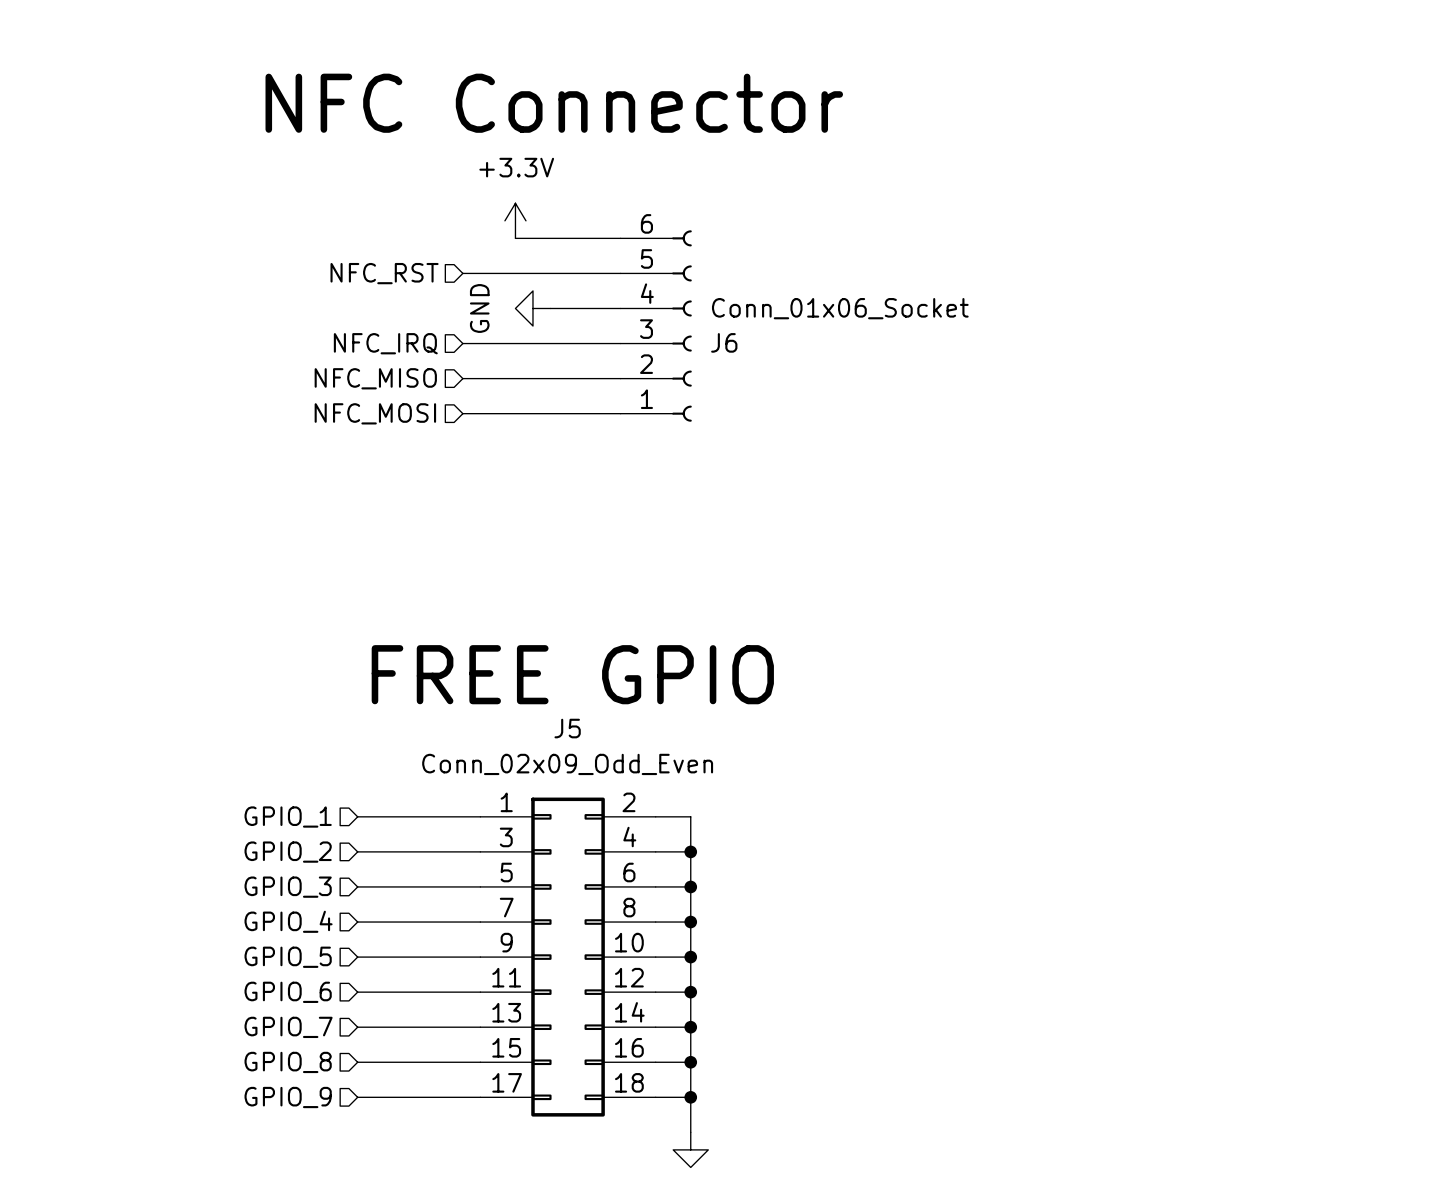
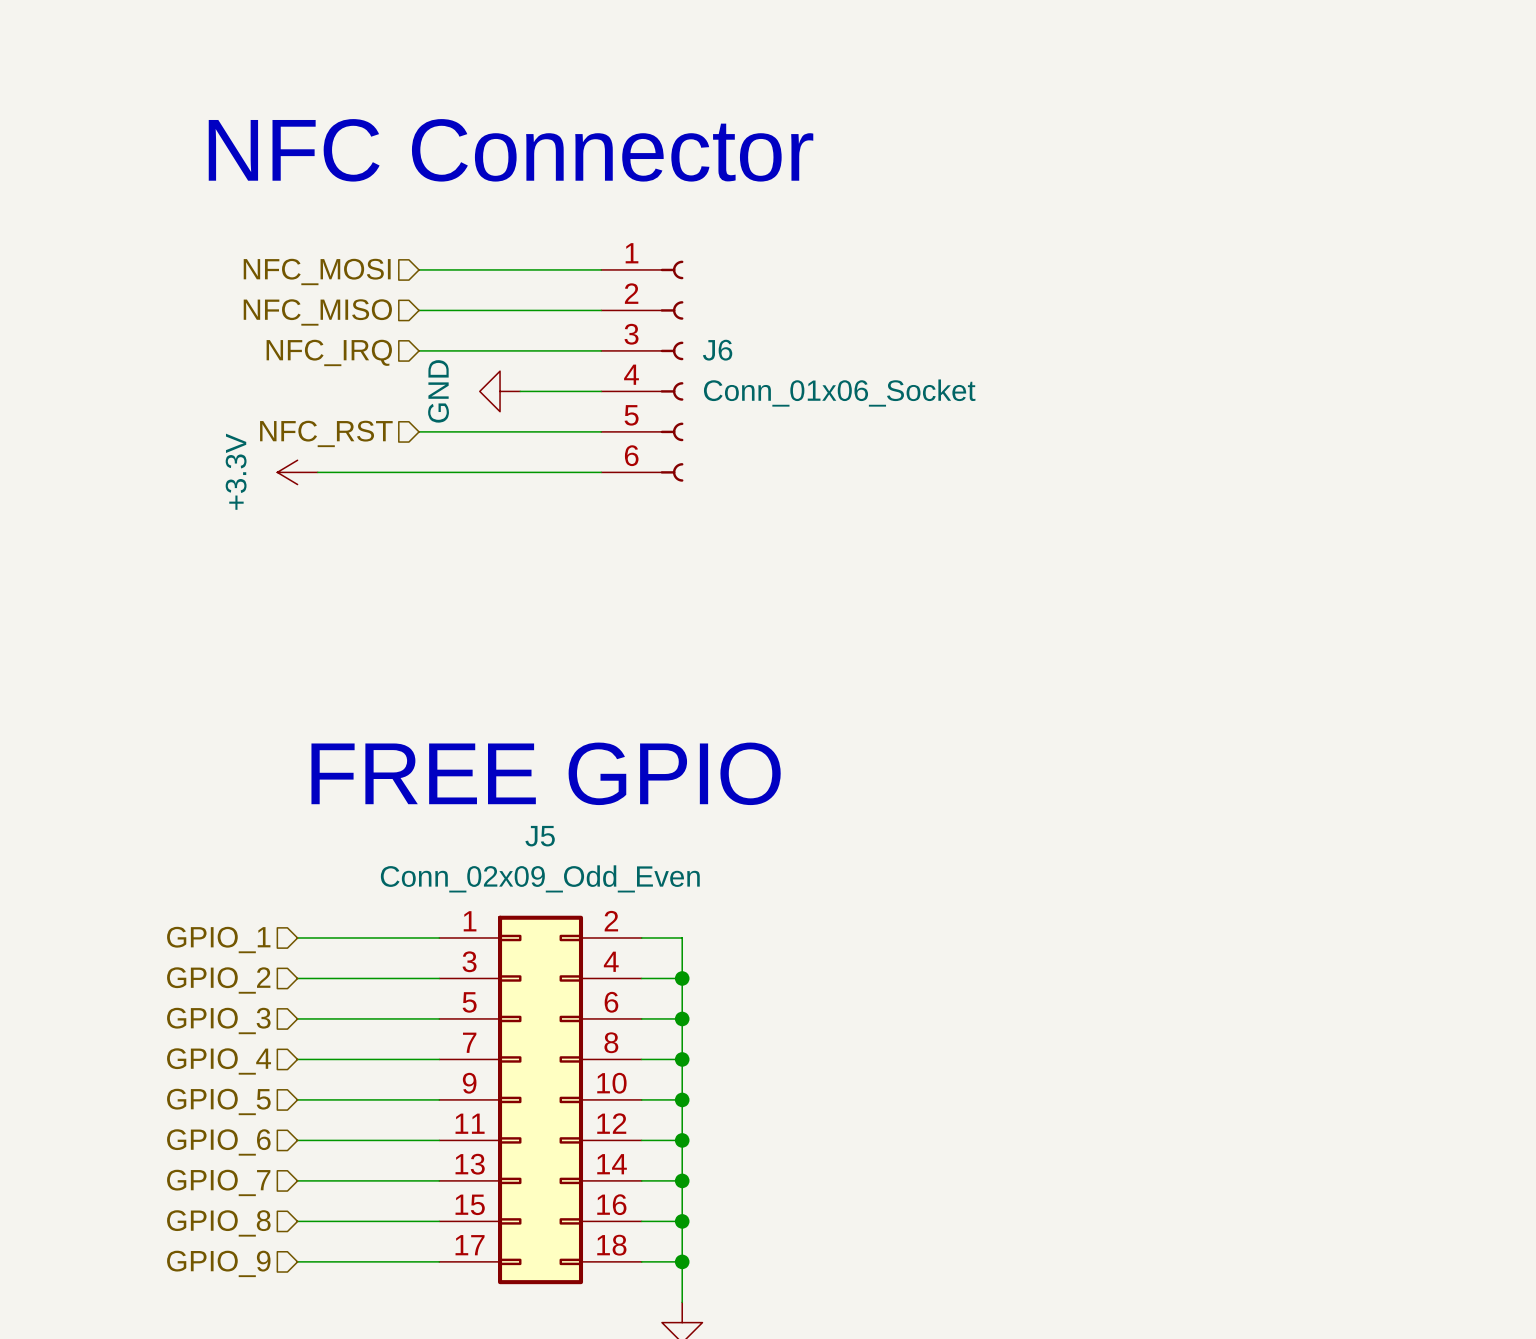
text position: NFC Connector (554, 103) -> NFC Connector (511, 150)
power symbol rotation: 0° (515, 220) -> 90° counterclockwise (297, 472)
power symbol position: +3.3V (515, 220) -> +3.3V (297, 472)
wire: none -> (419, 269) (479, 269)
hierarchical label: NFC_RST (384, 273) -> NFC_MISO (317, 312)
power symbol position: GND (532, 308) -> GND (500, 391)
J6 flip: as is (681, 326) -> up-down (672, 371)
hierarchical label position: NFC_IRQ (385, 343) -> NFC_IRQ (329, 352)
wire: (462, 343) (550, 343) -> (419, 350) (520, 350)
hierarchical label: NFC_MISO (375, 378) -> NFC_RST (326, 433)
wire: none -> (317, 472) (419, 472)
hierarchical label position: NFC_MOSI (375, 413) -> NFC_MOSI (317, 271)

